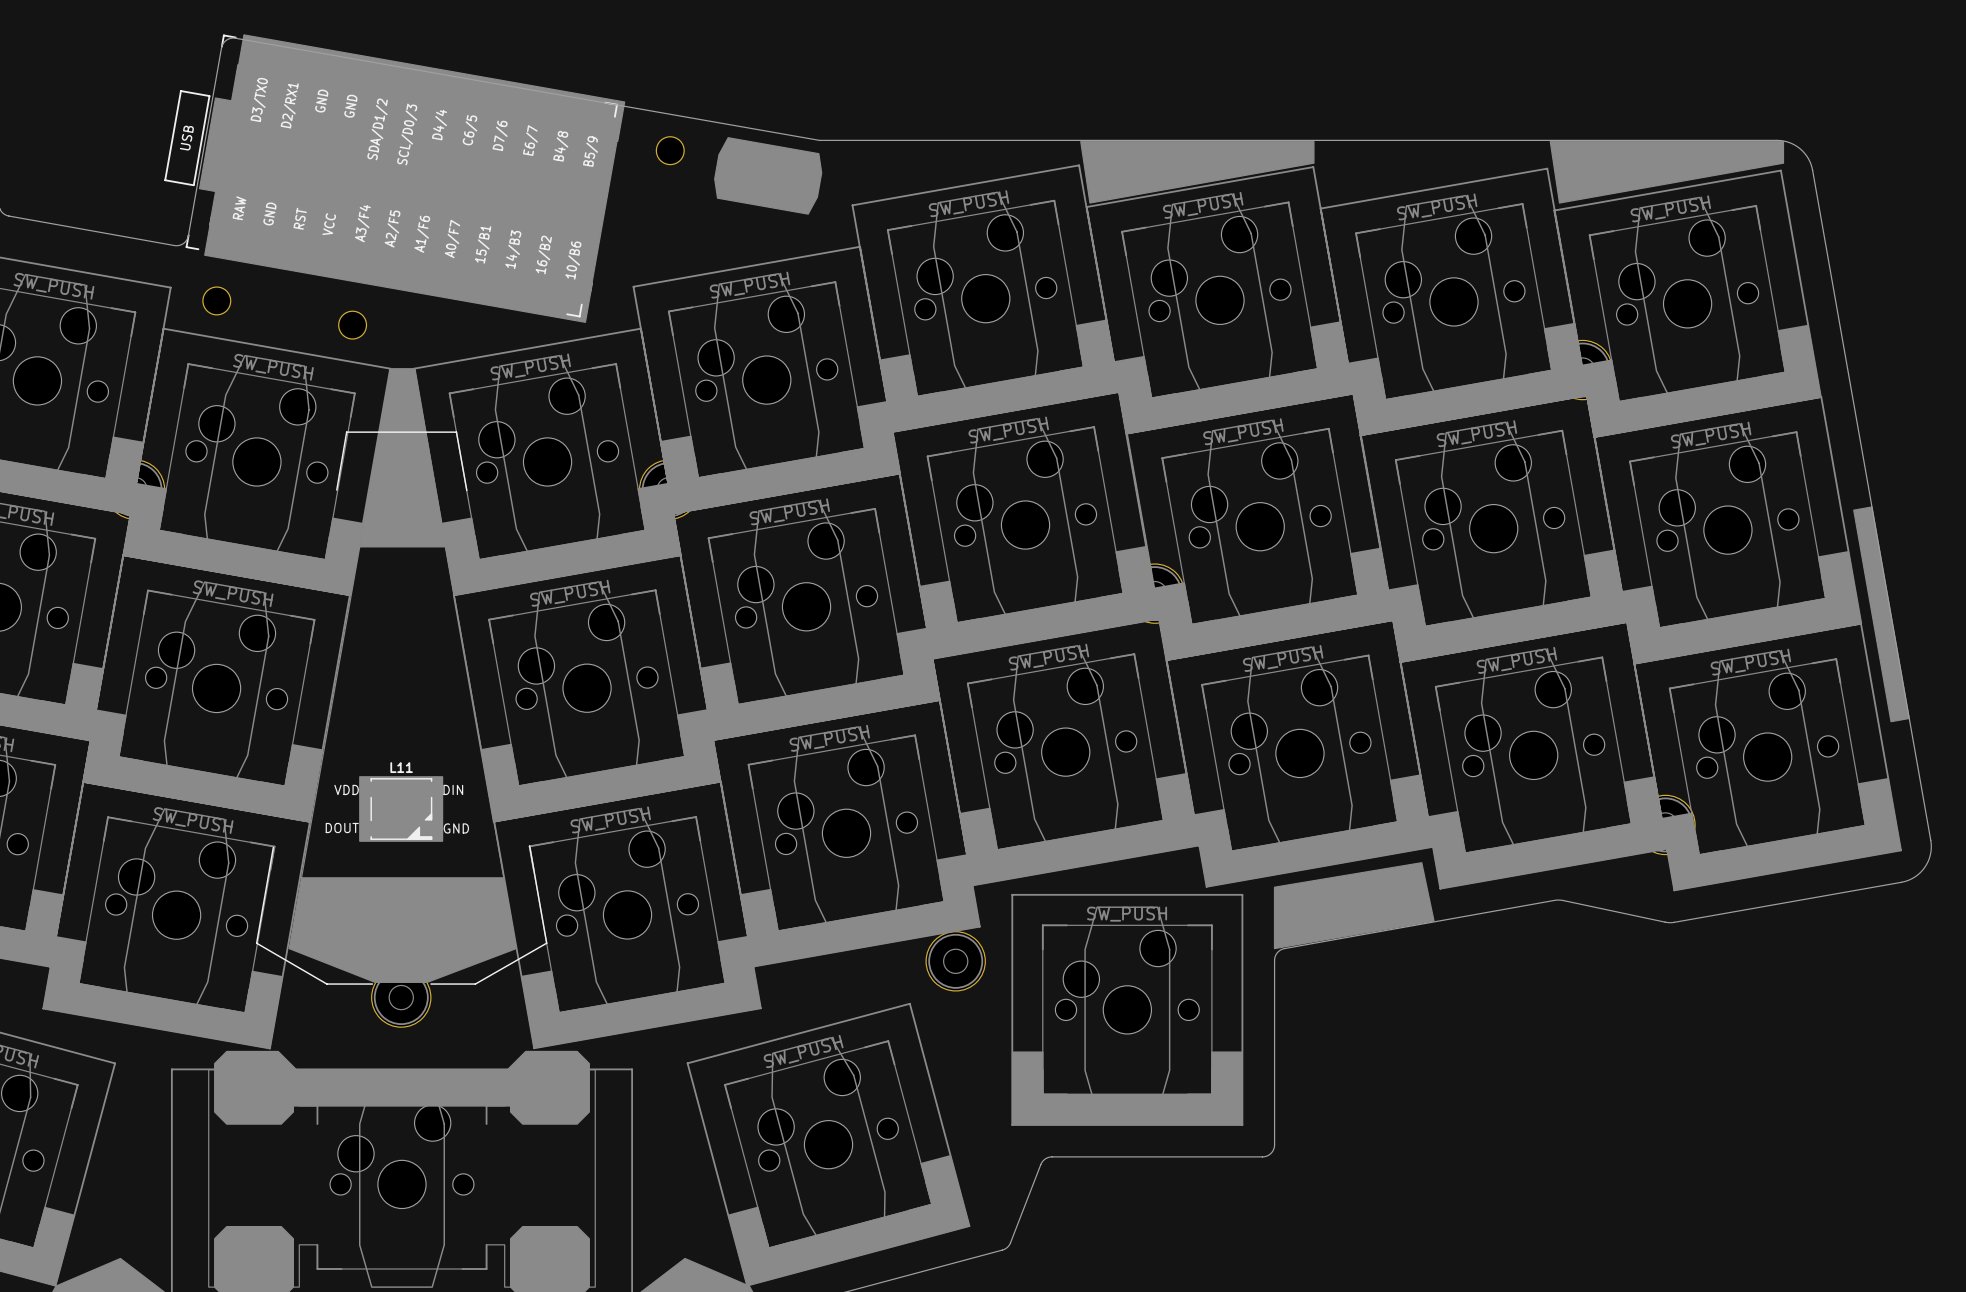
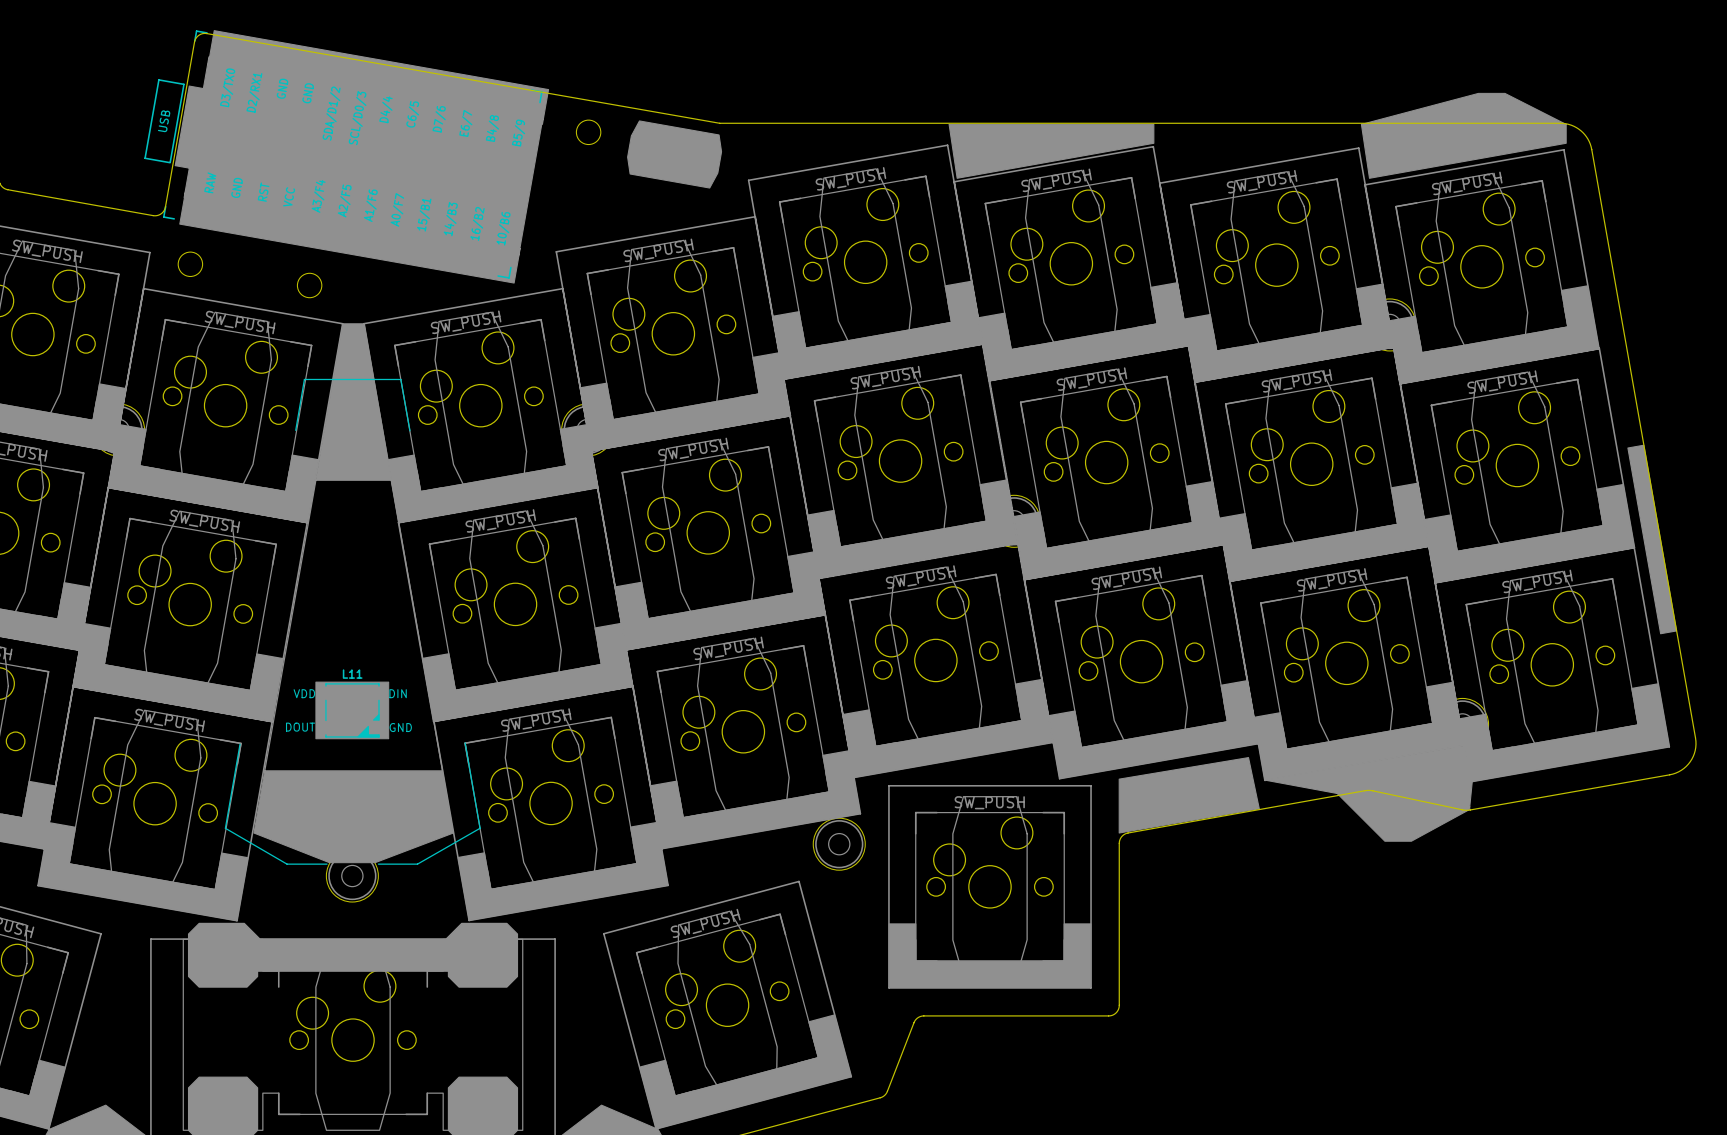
drawing: none -> [1360, 92, 1567, 125]
drawing: none -> [1265, 745, 1473, 842]

